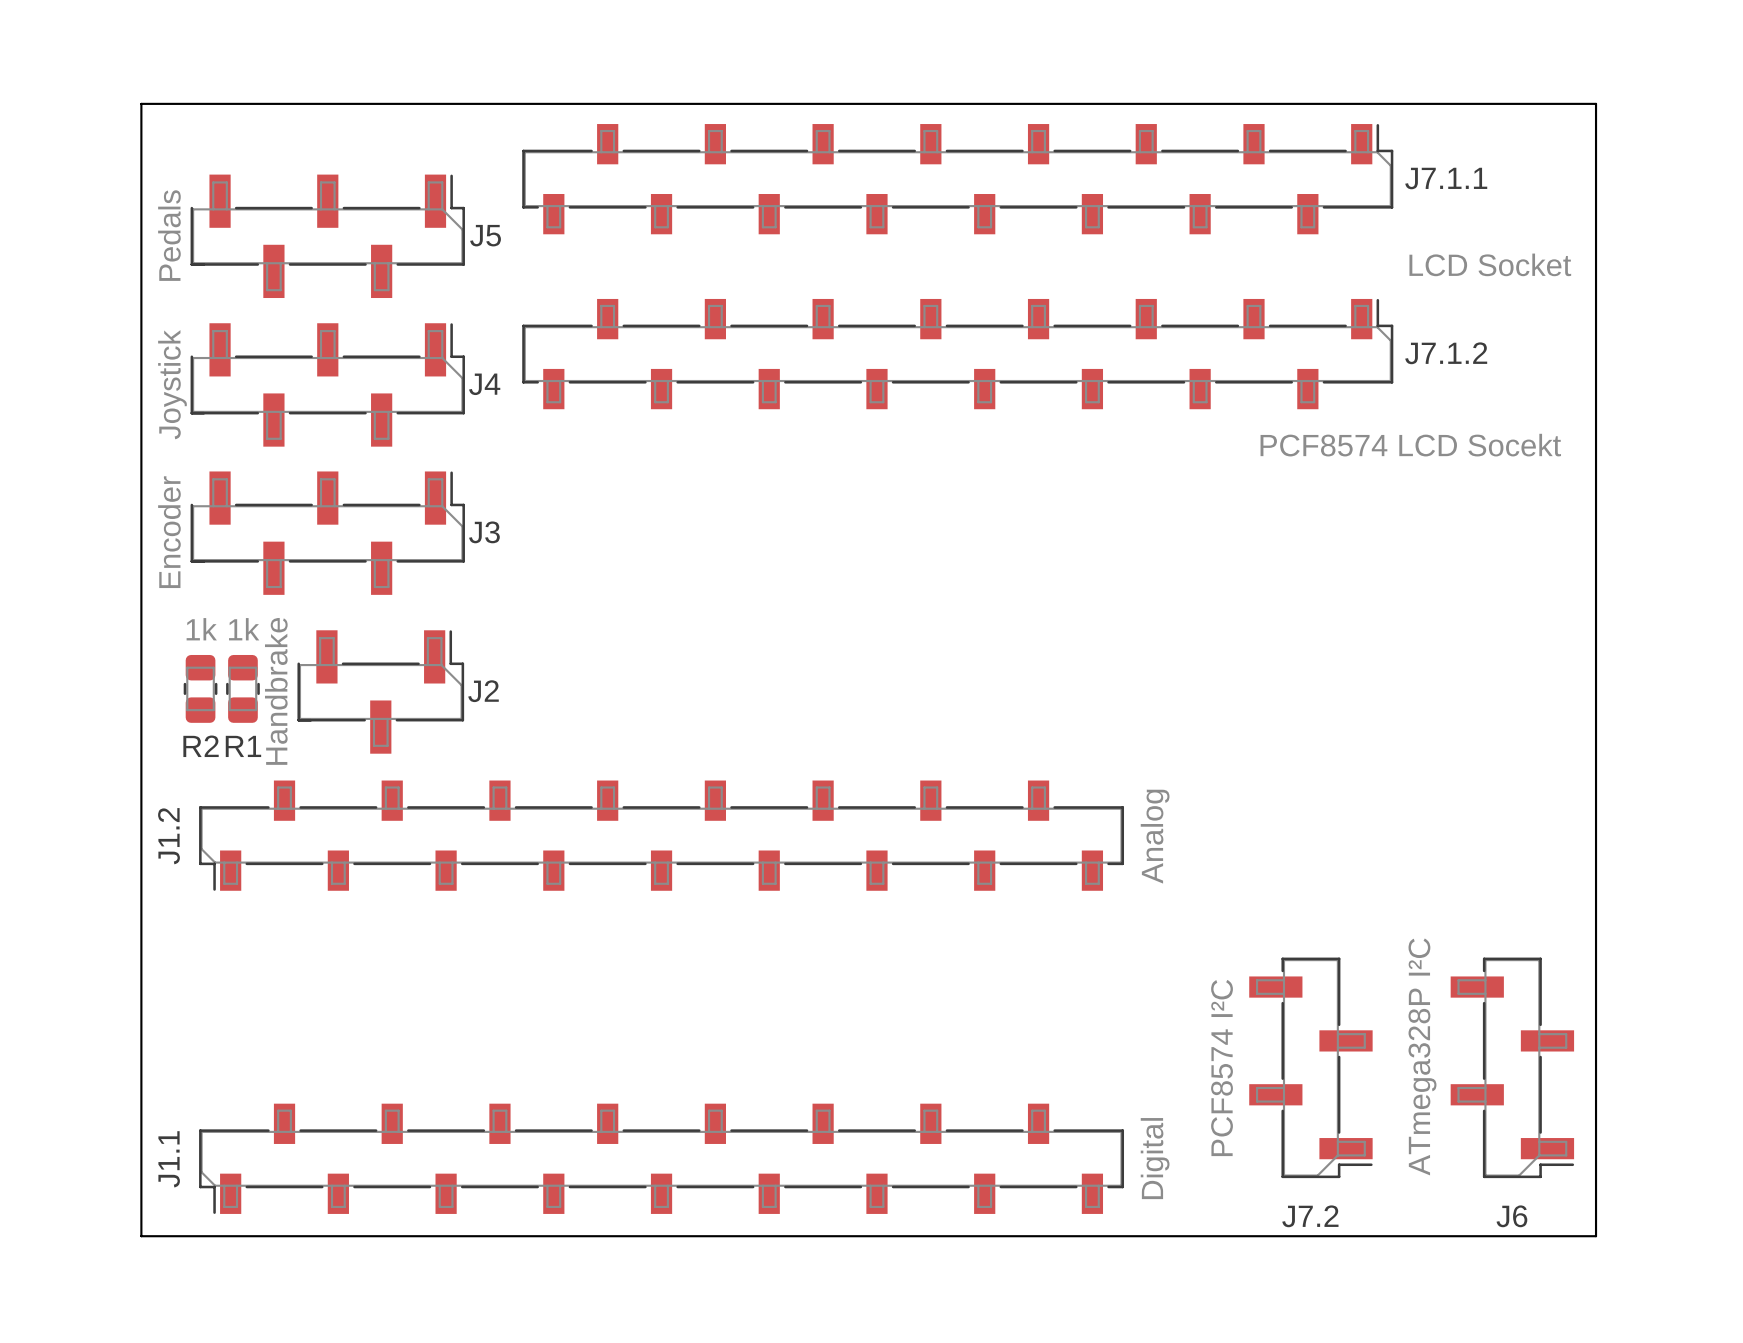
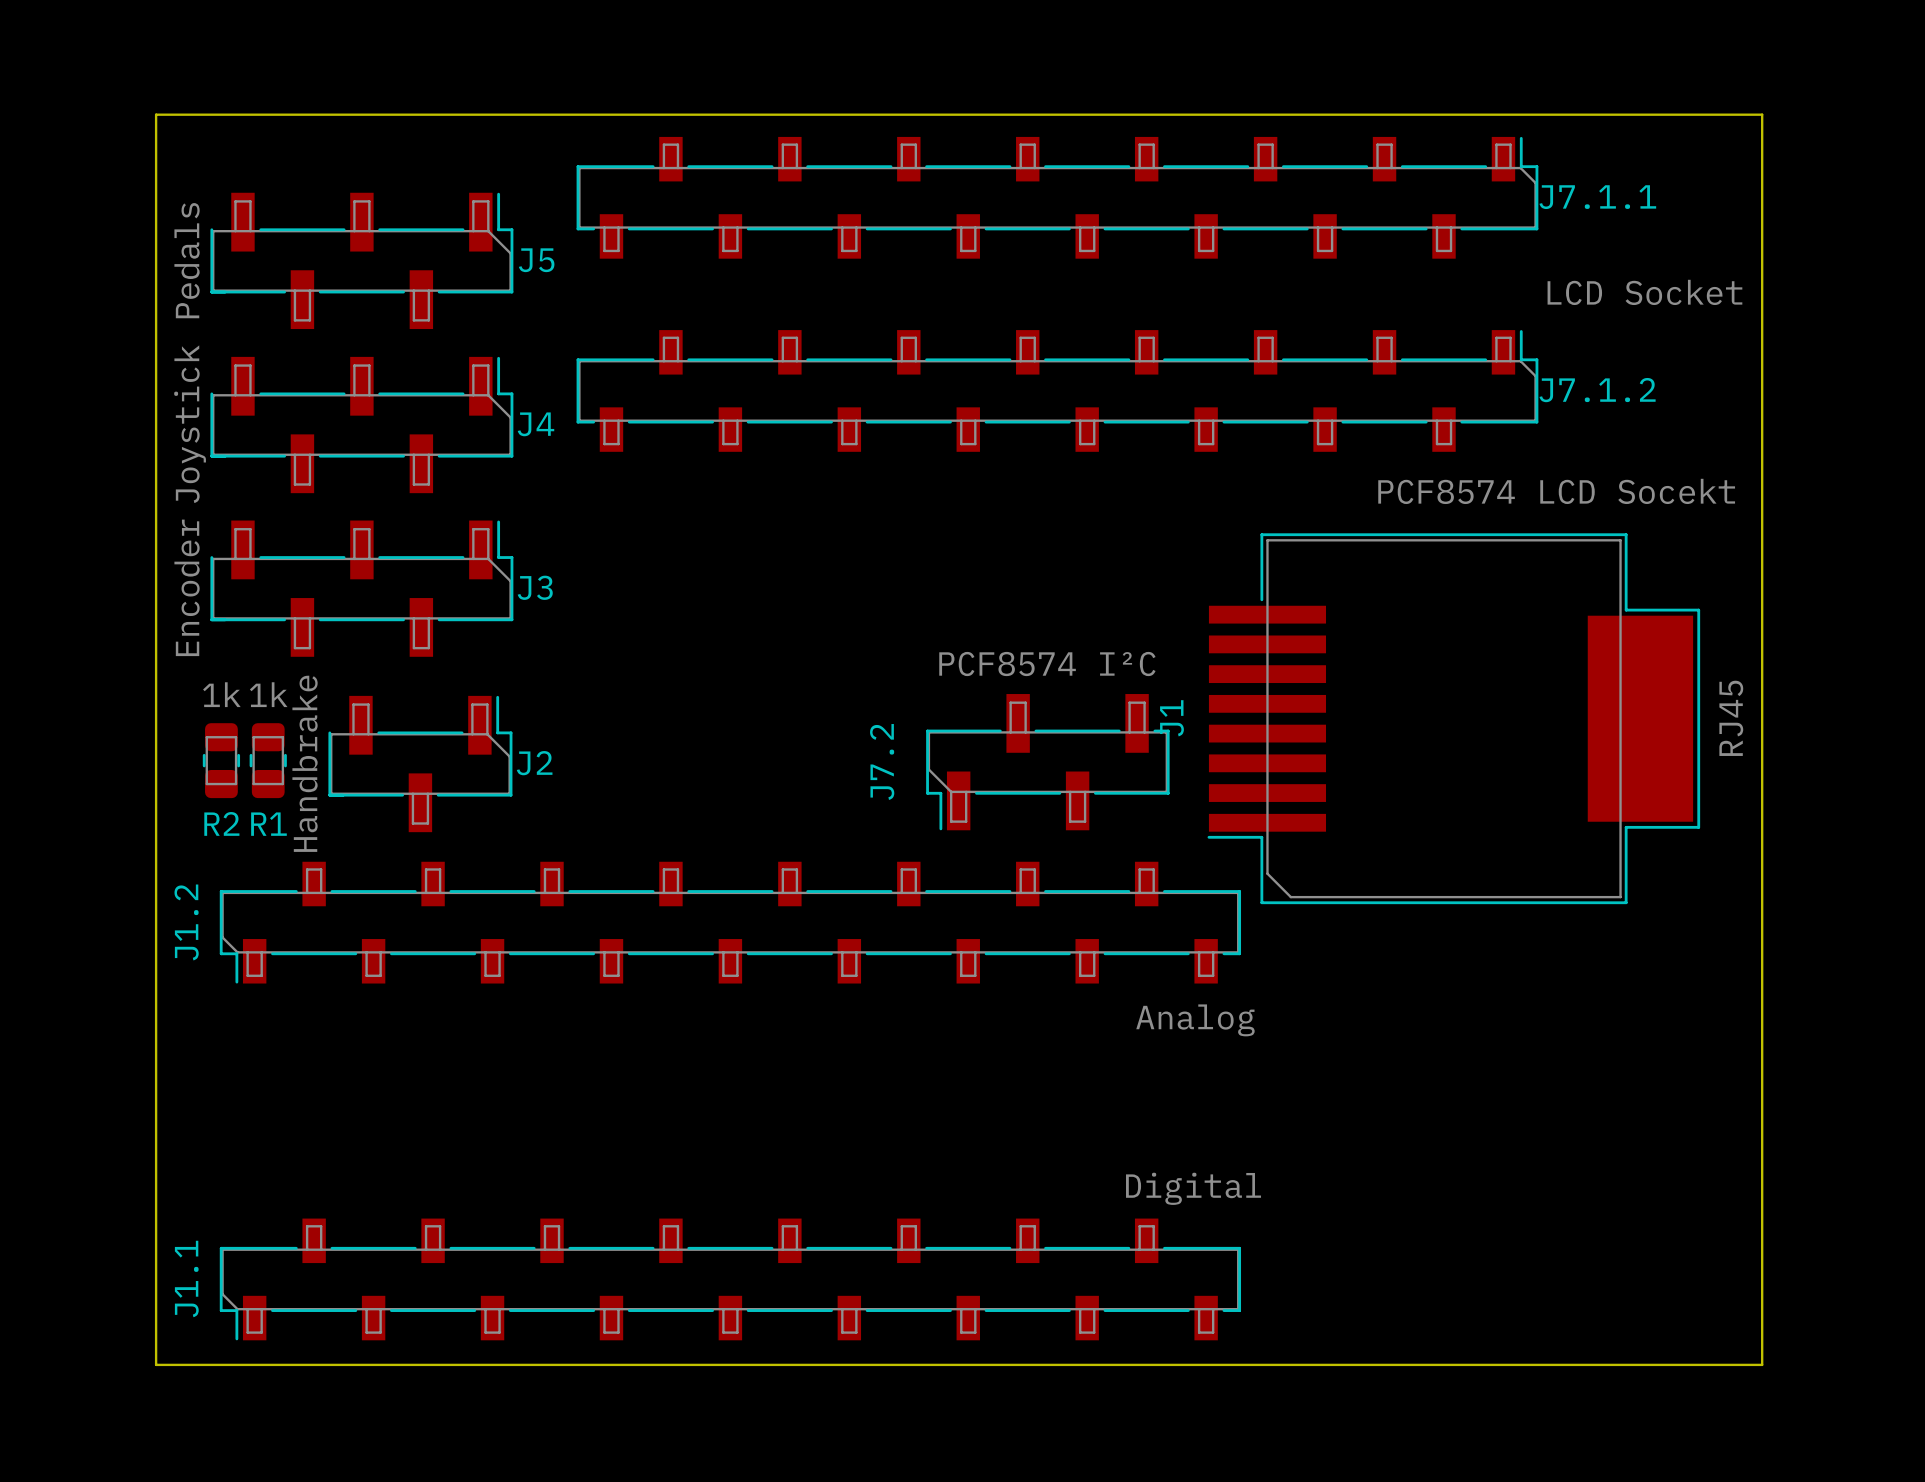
J1: none -> RJ45 (1453, 718)
J1.2 value rotation: 0° (1155, 836) -> 90° clockwise (1195, 1020)
J7.2 rotation: 0° (1310, 1067) -> 90° clockwise (1047, 762)
J7.2 position: (1310, 1067) -> (1047, 762)
J6: ATmega328P I²C (1512, 1067) -> none
J1.1 value rotation: 0° (1155, 1158) -> 90° clockwise (1193, 1188)

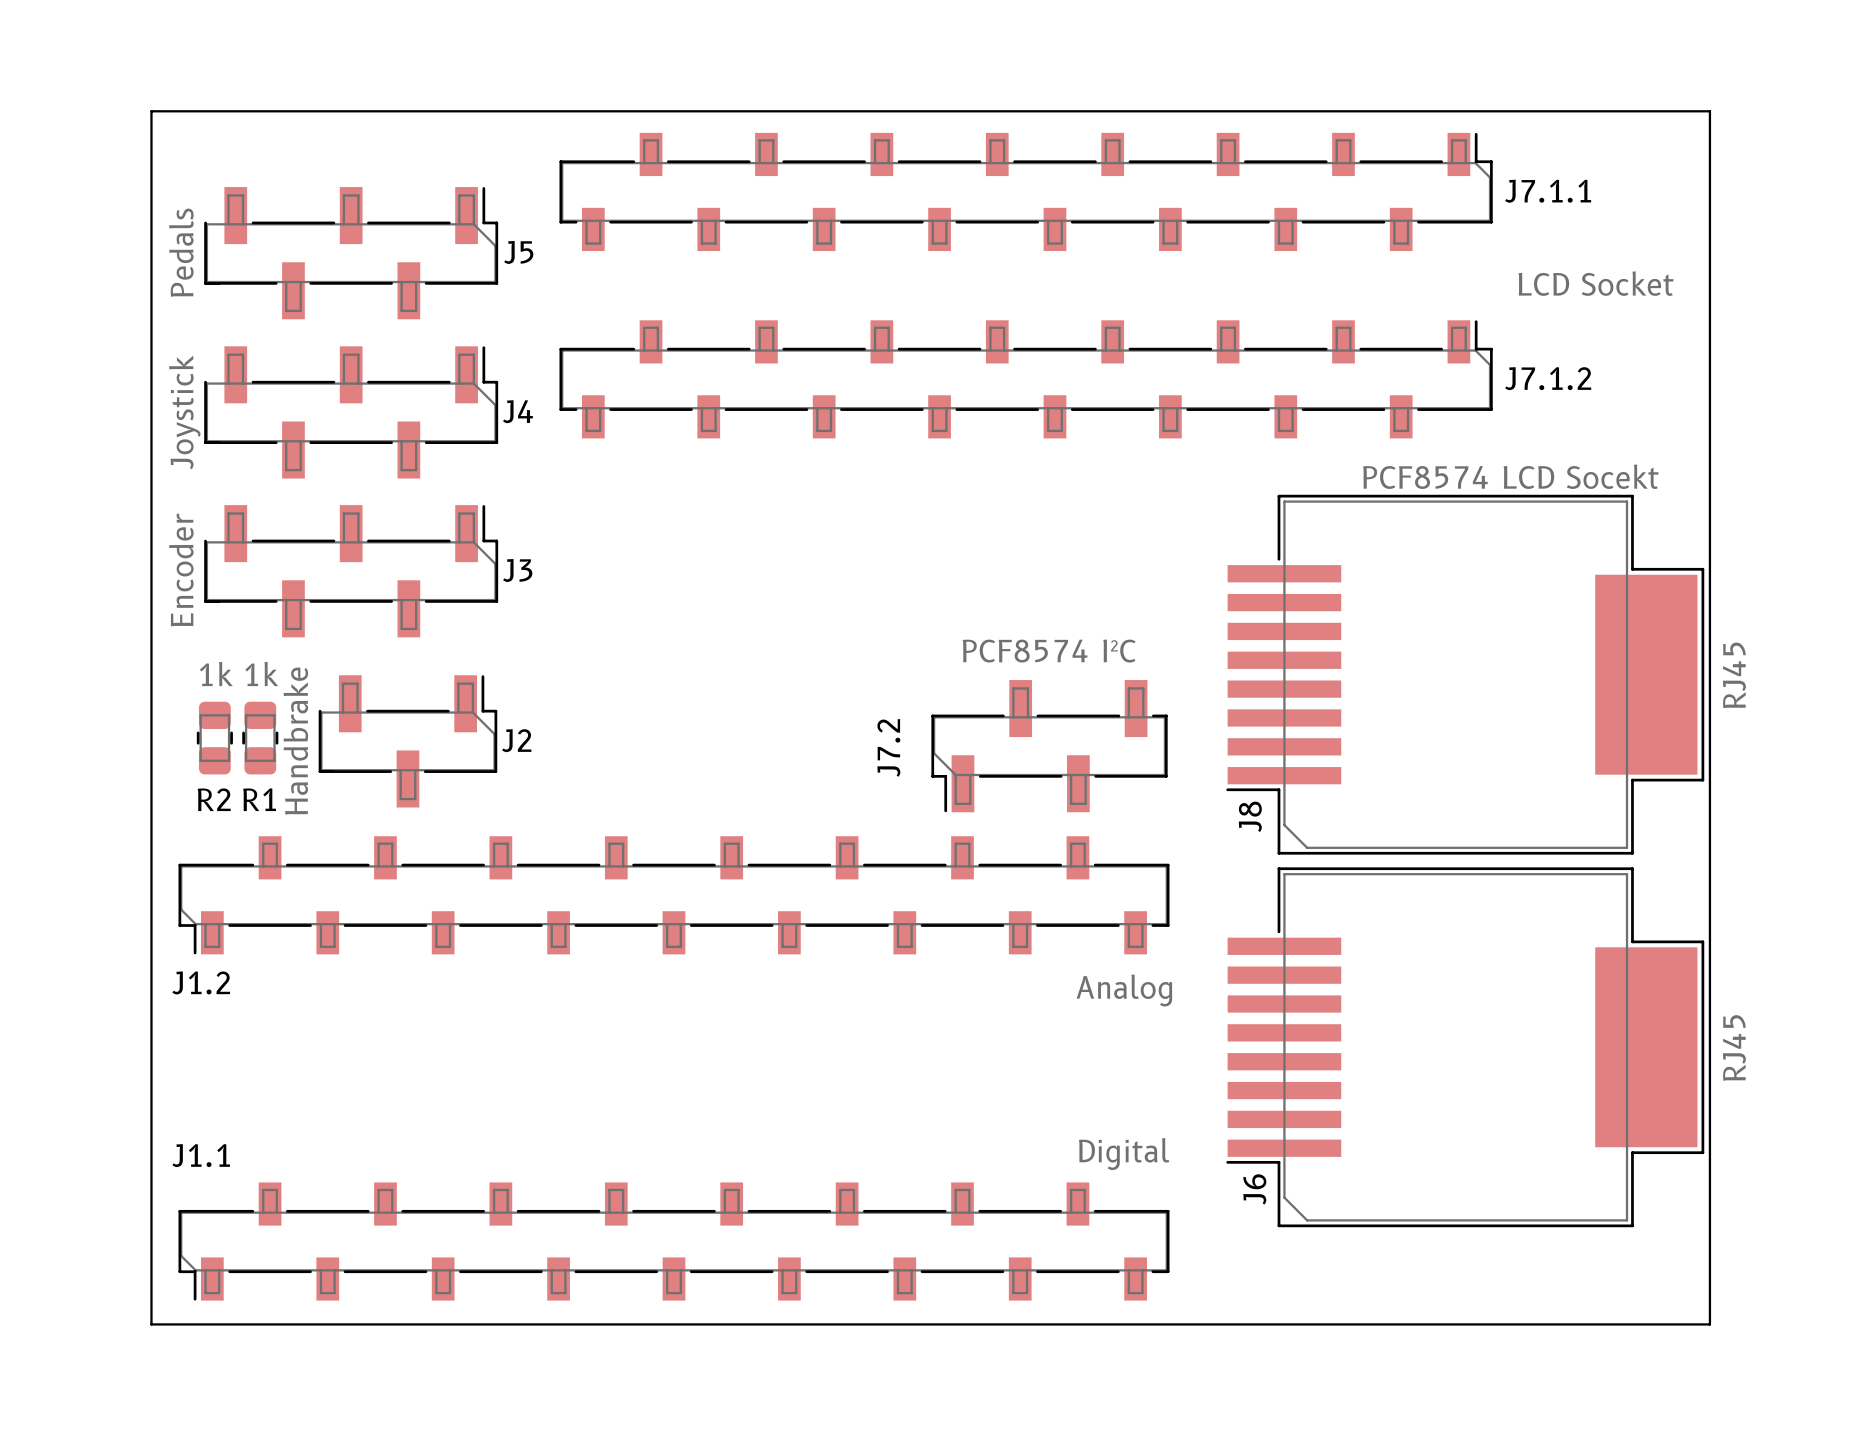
J8: none -> RJ45 (1465, 674)
J1: RJ45 (1453, 718) -> none
J7.2 position: (1047, 762) -> (1049, 746)
J1.2 name rotation: 0° (186, 922) -> 90° clockwise (201, 982)
J1.2 position: (730, 922) -> (673, 895)
J6: none -> RJ45 (1465, 1047)
J1.1 name rotation: 0° (186, 1278) -> 90° clockwise (201, 1155)
J1.1 position: (730, 1279) -> (673, 1241)

